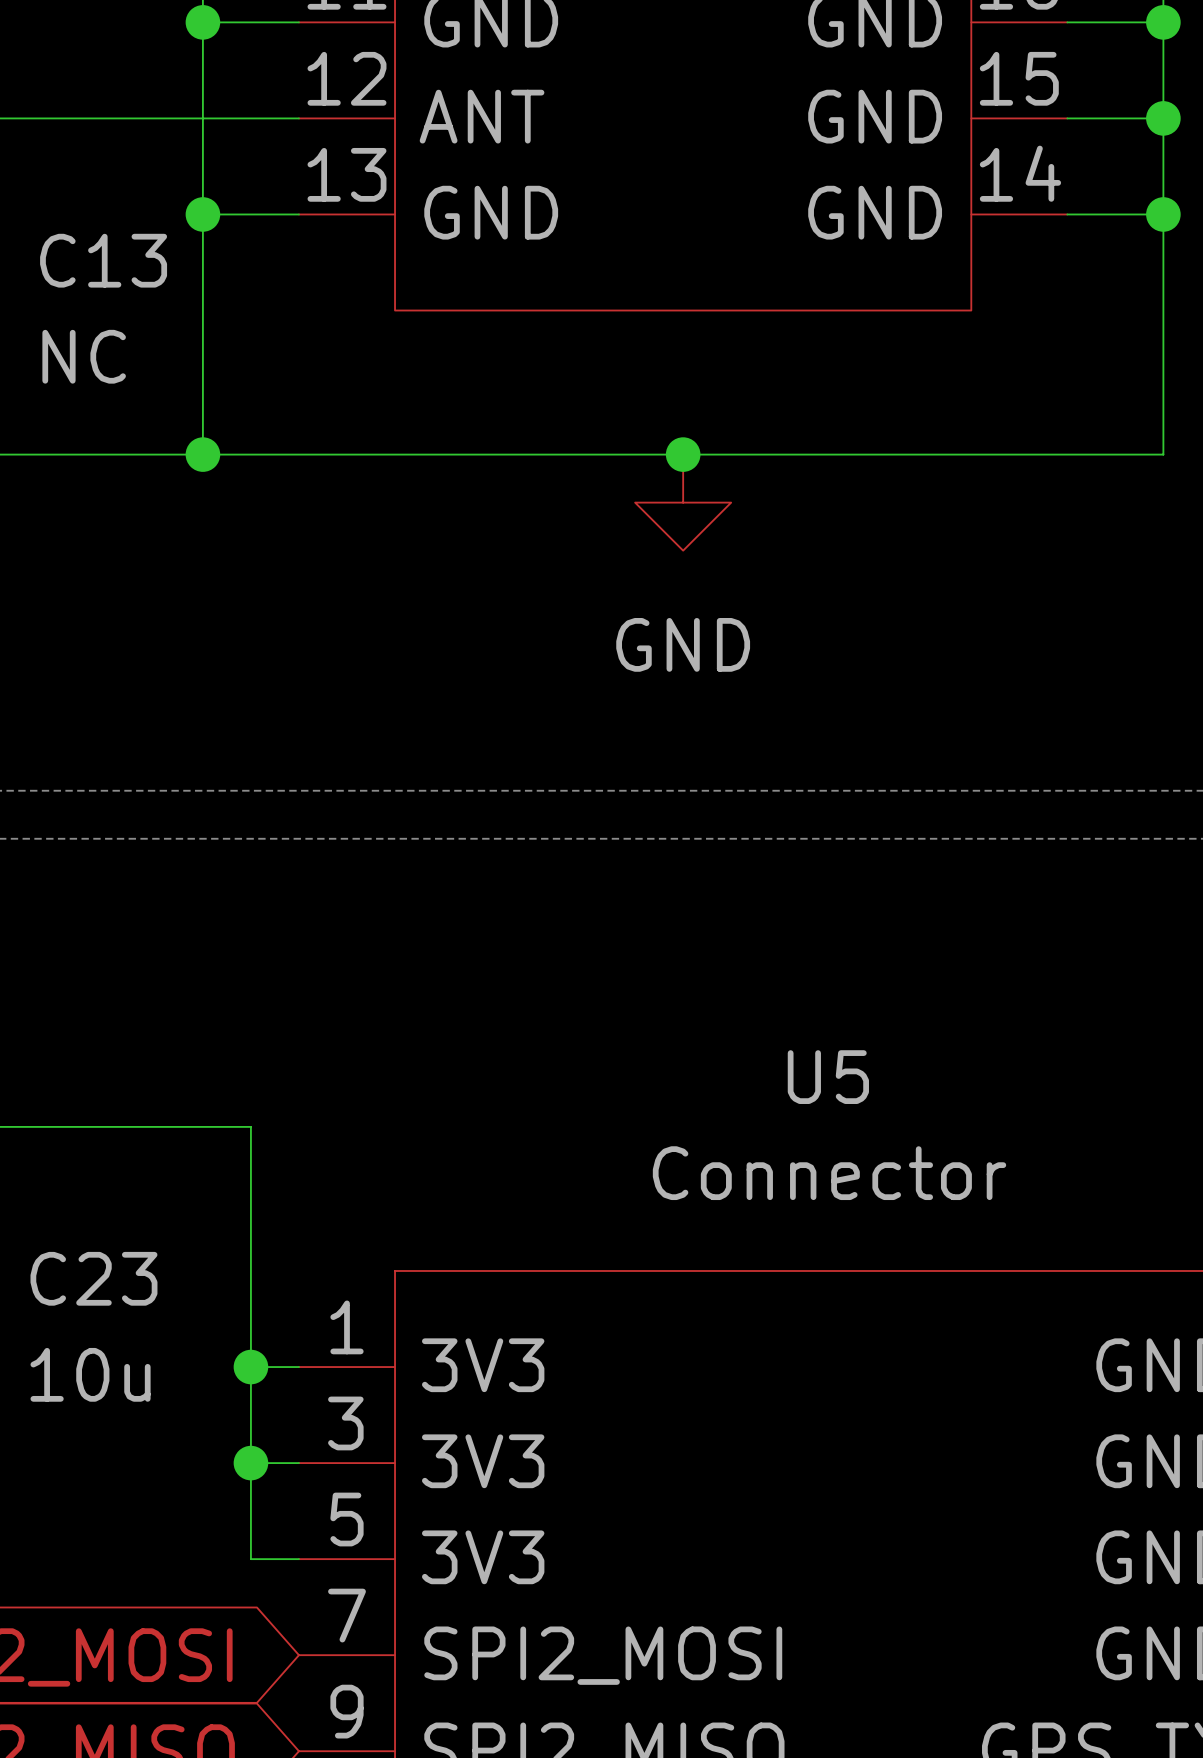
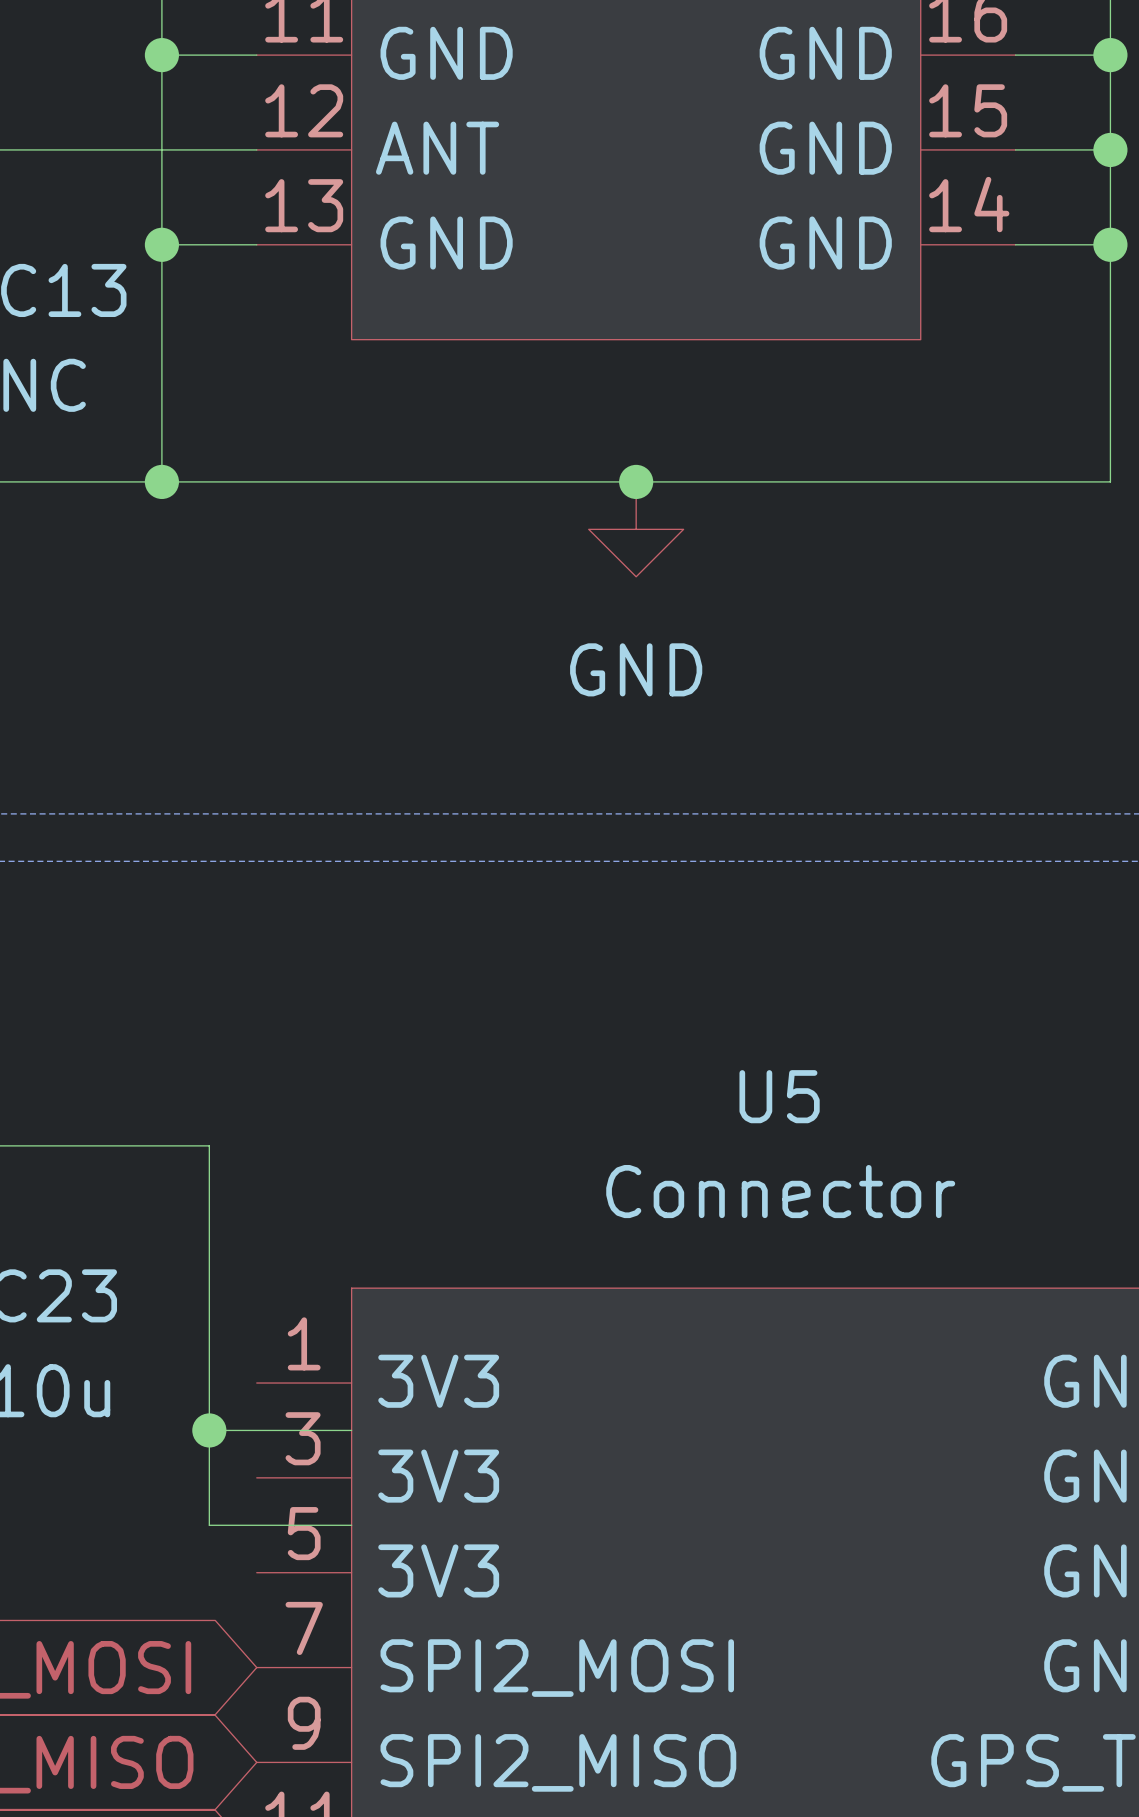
wire: (250, 1367) (298, 1367) -> none
junction: (250, 1367) -> none
wire: none -> (209, 1430) (351, 1430)
junction: none -> (209, 1430)
wire: (250, 1463) (298, 1463) -> none
junction: (250, 1463) -> none
wire: (250, 1511) (250, 1559) (298, 1559) -> (209, 1525) (351, 1525)

